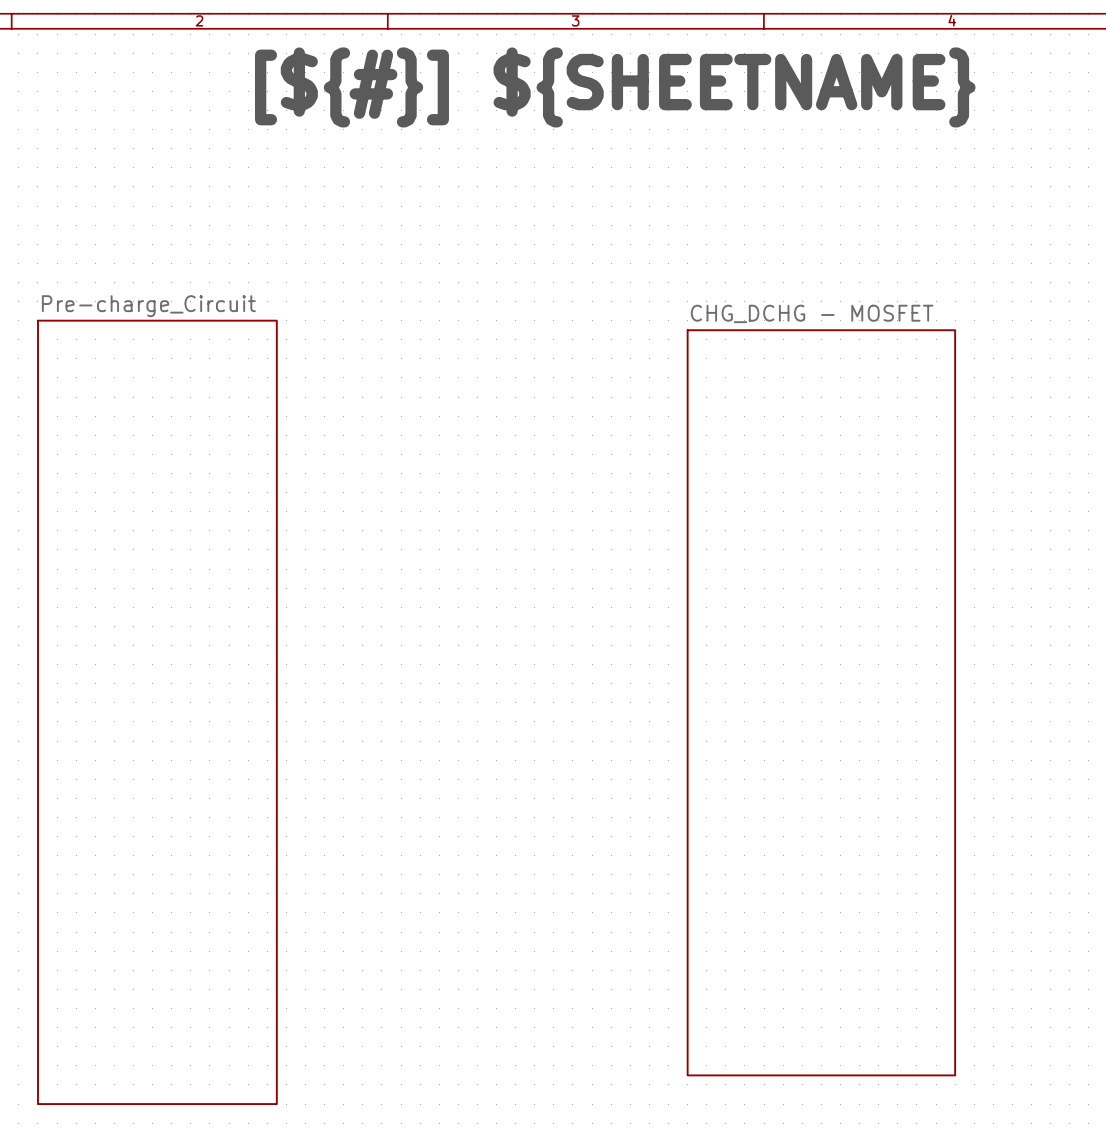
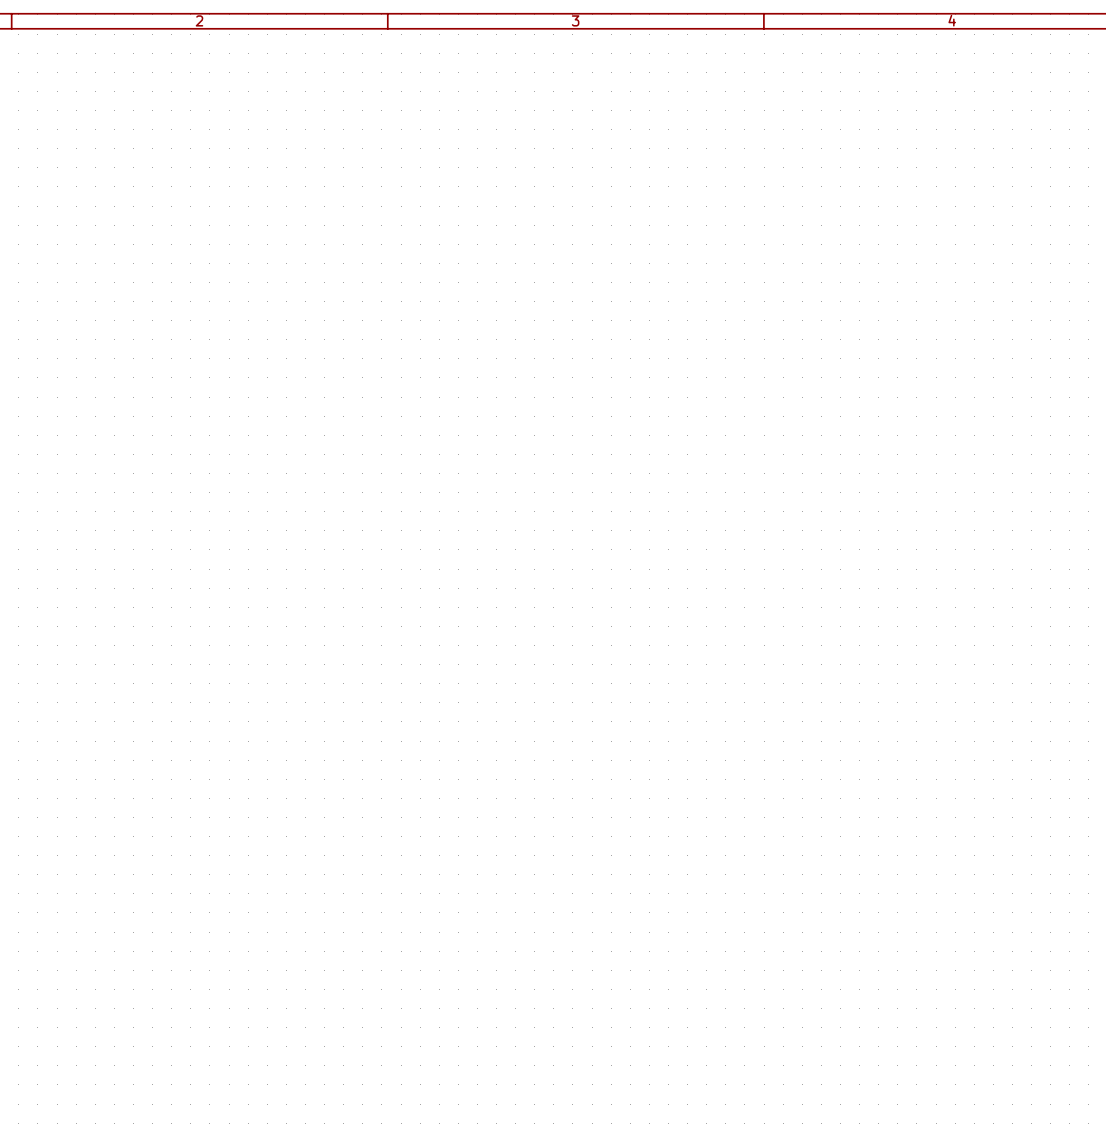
text: [${#}] ${SHEETNAME} (615, 87) -> none
sheet CHG_DCHG - MOSFET: (821, 702) -> none
sheet Pre-charge_Circuit: (157, 712) -> none

